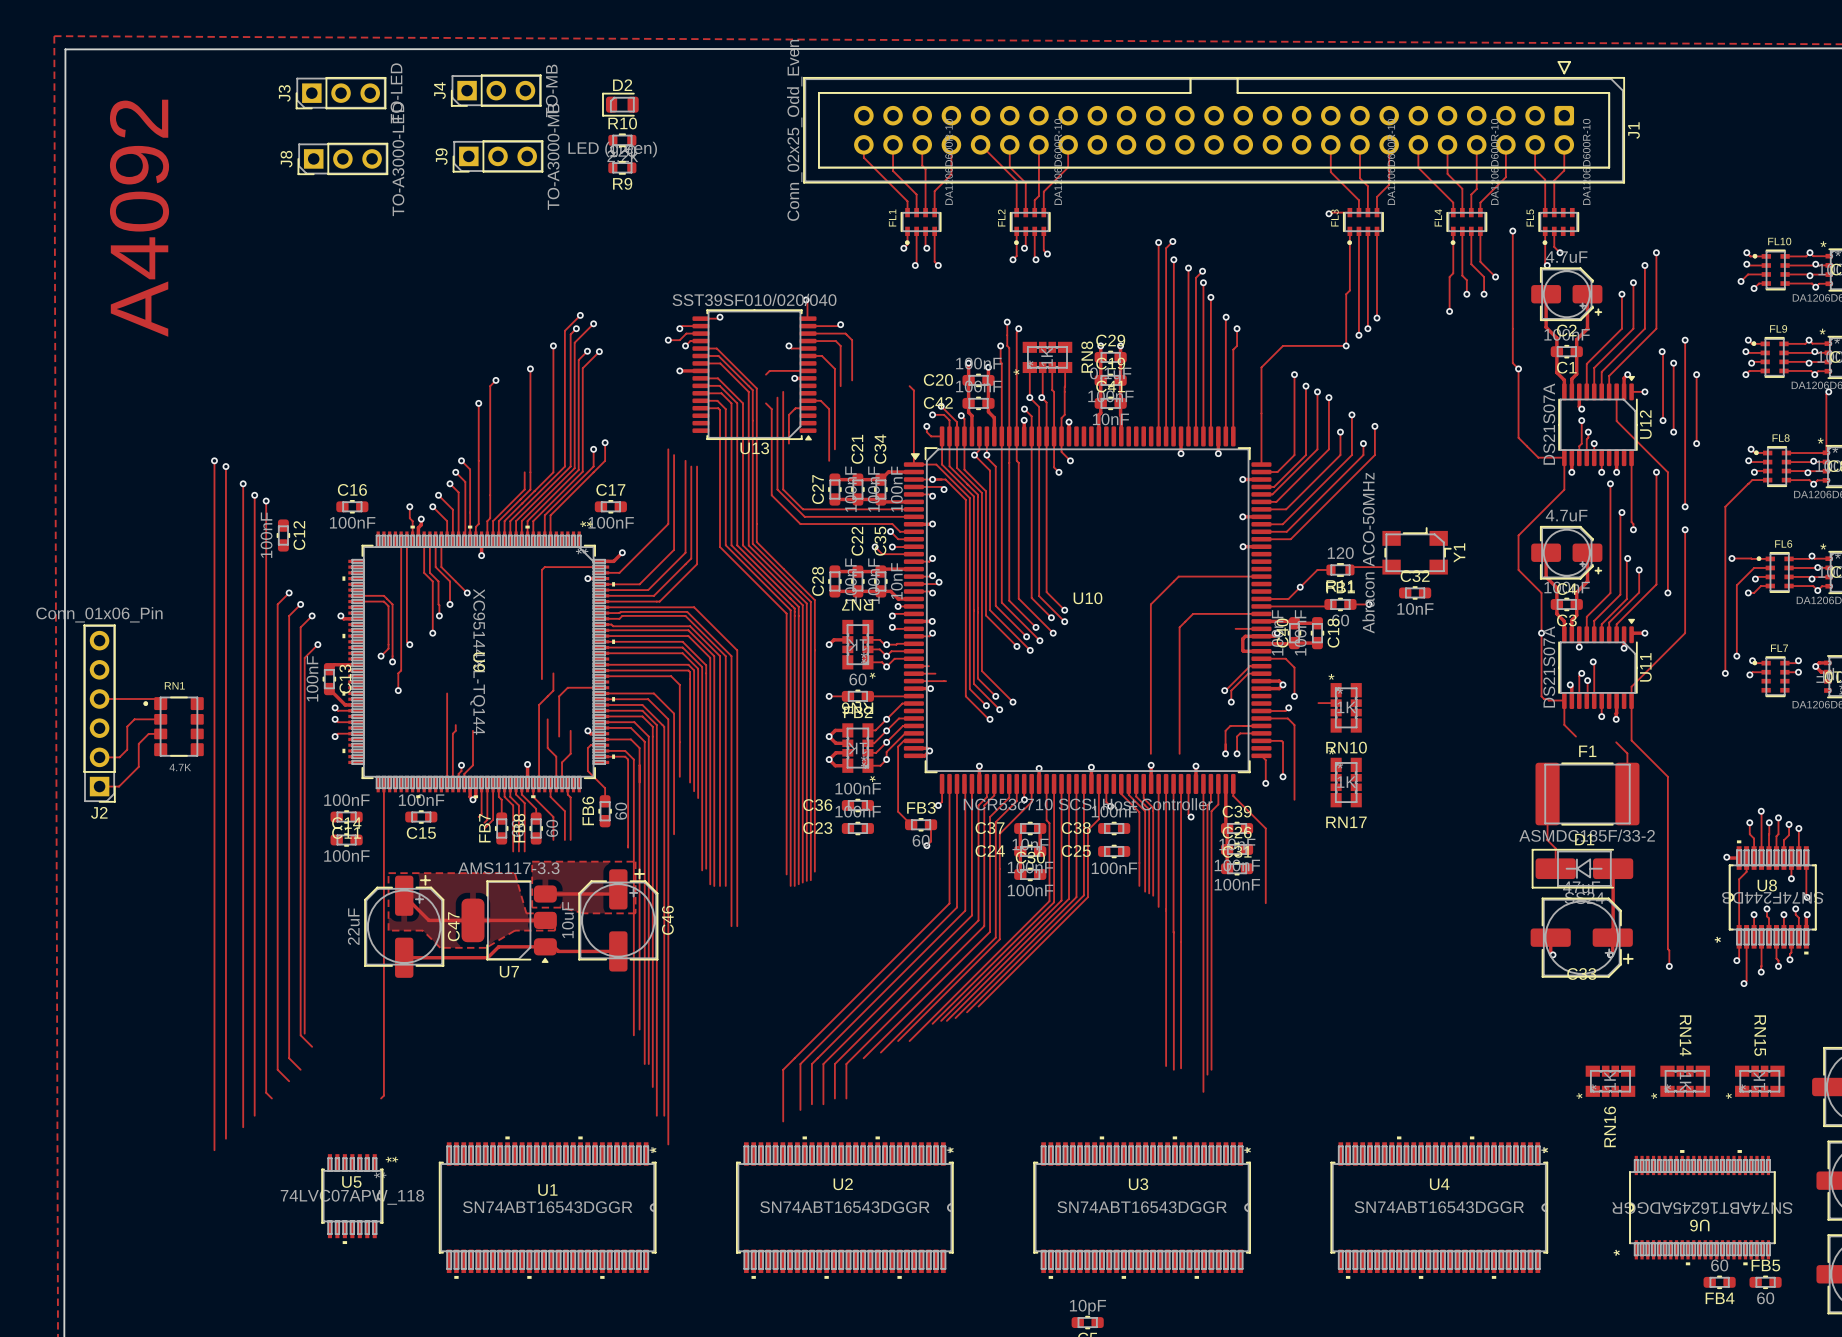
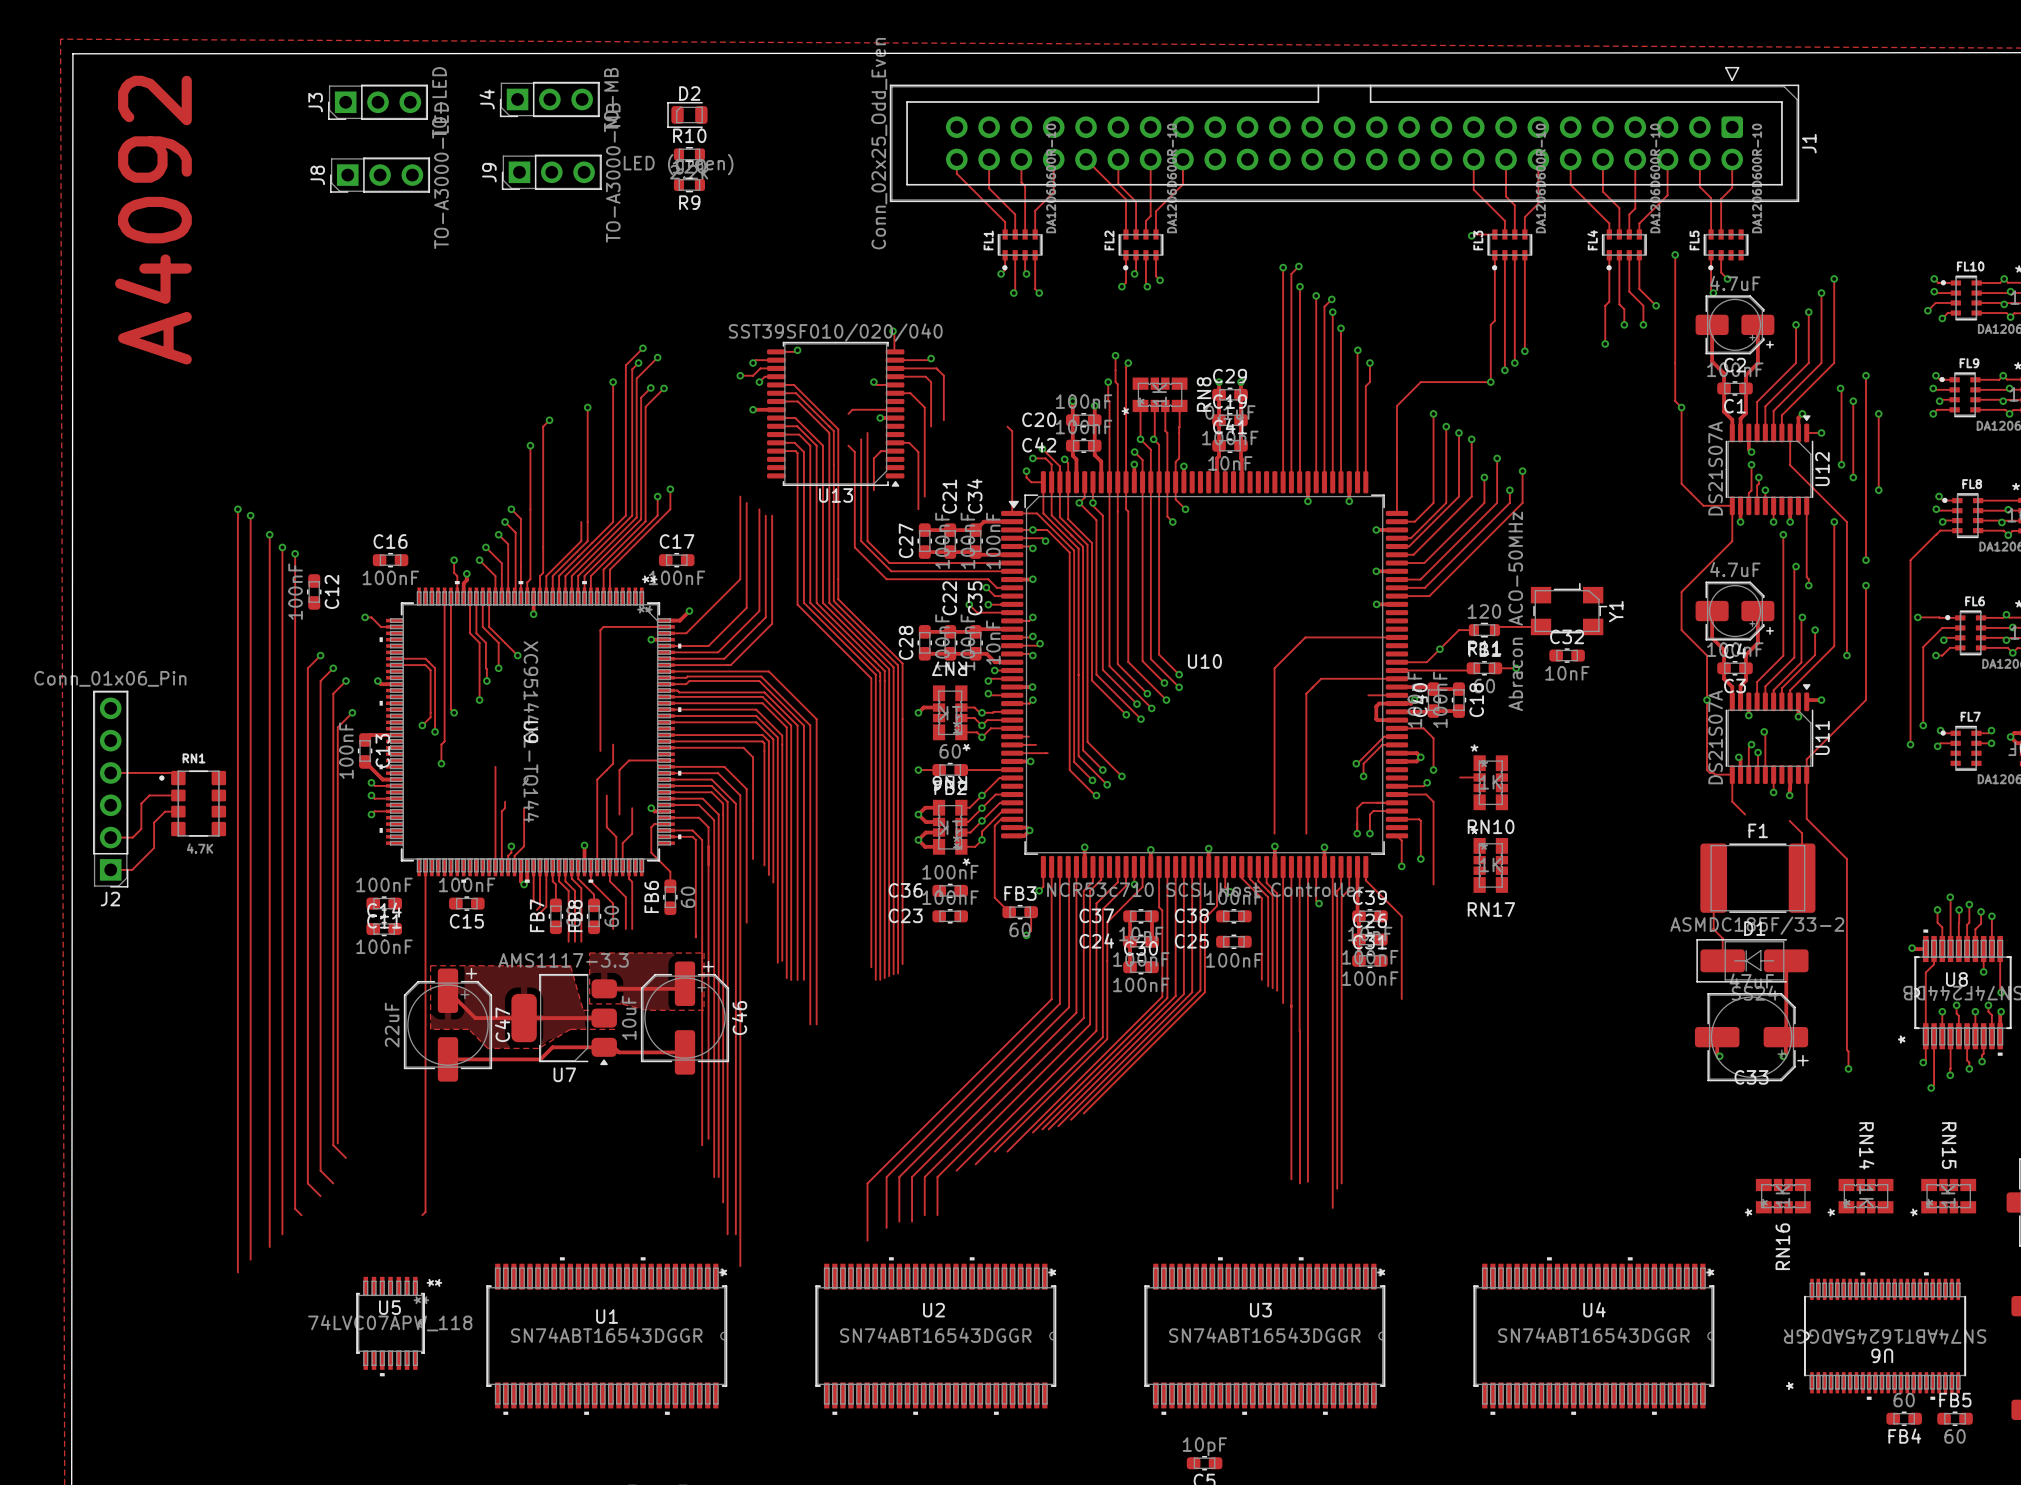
track: none -> (365, 617) (371, 617) (381, 626) (394, 626)
via: none -> (365, 617)

